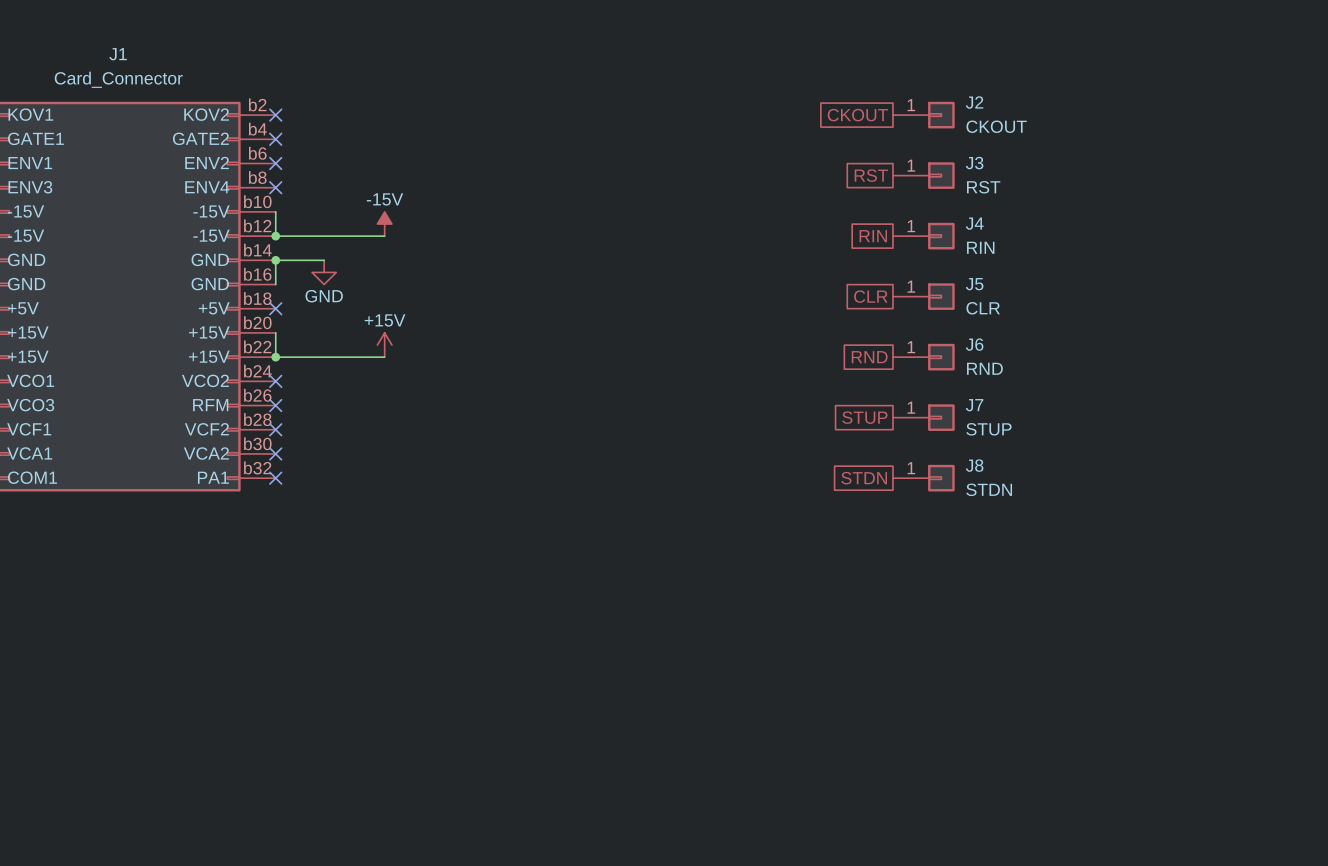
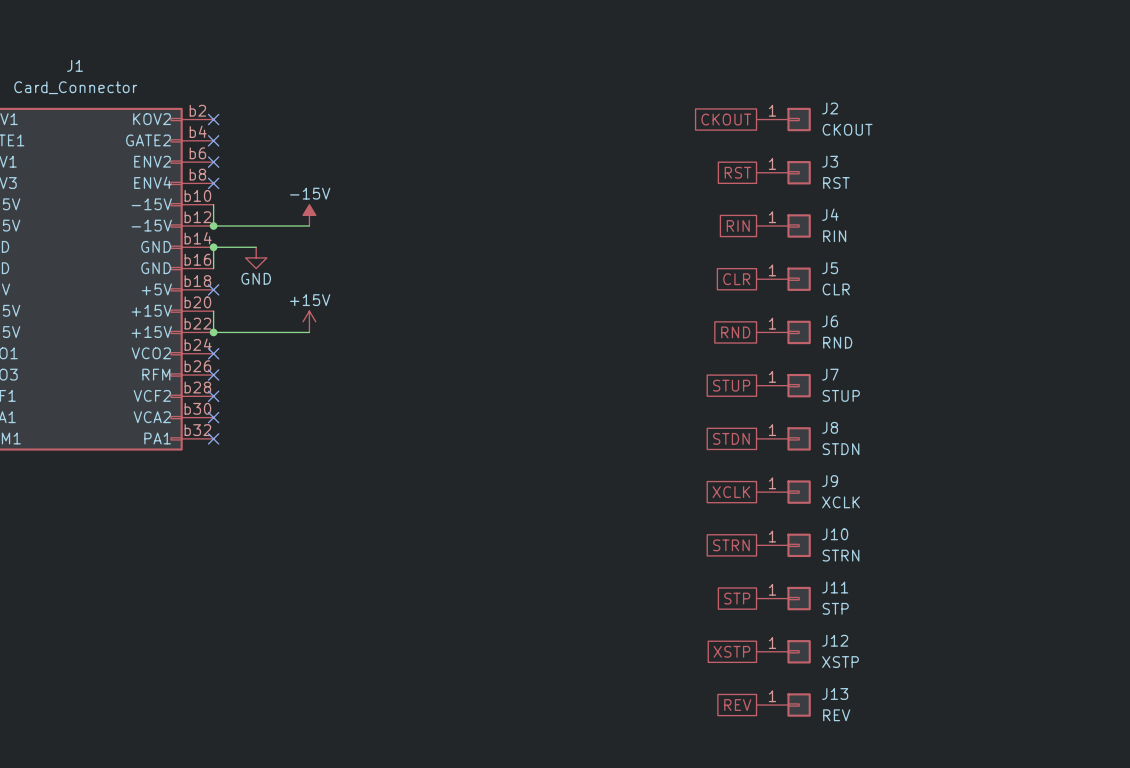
global label: none -> XCLK (731, 492)
J9: none -> XCLK (783, 492)
global label: none -> STRN (731, 545)
J10: none -> STRN (783, 545)
global label: none -> STP (737, 598)
J11: none -> STP (783, 598)
global label: none -> XSTP (731, 651)
J12: none -> XSTP (783, 651)
global label: none -> REV (737, 705)
J13: none -> REV (783, 705)

